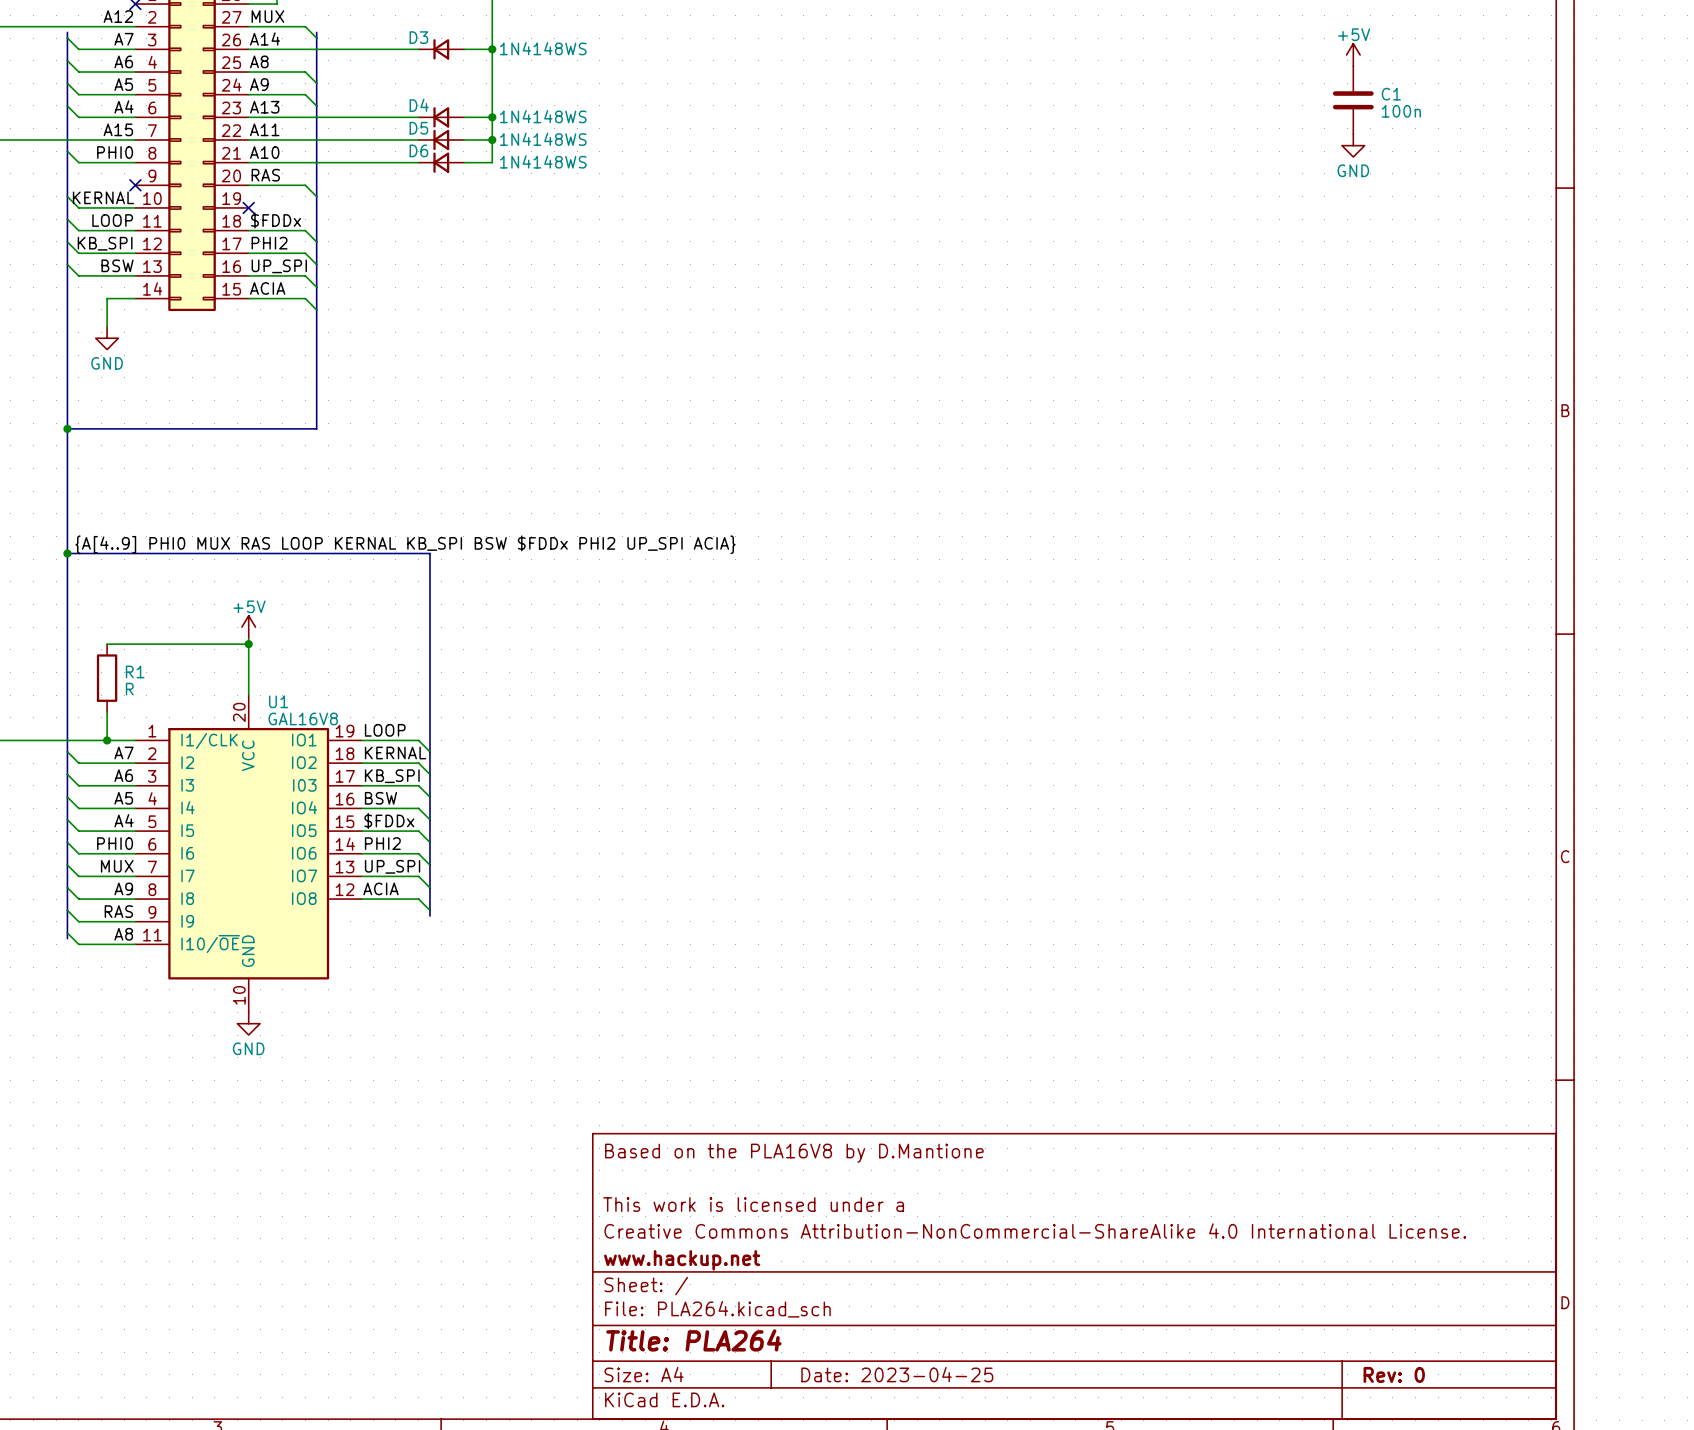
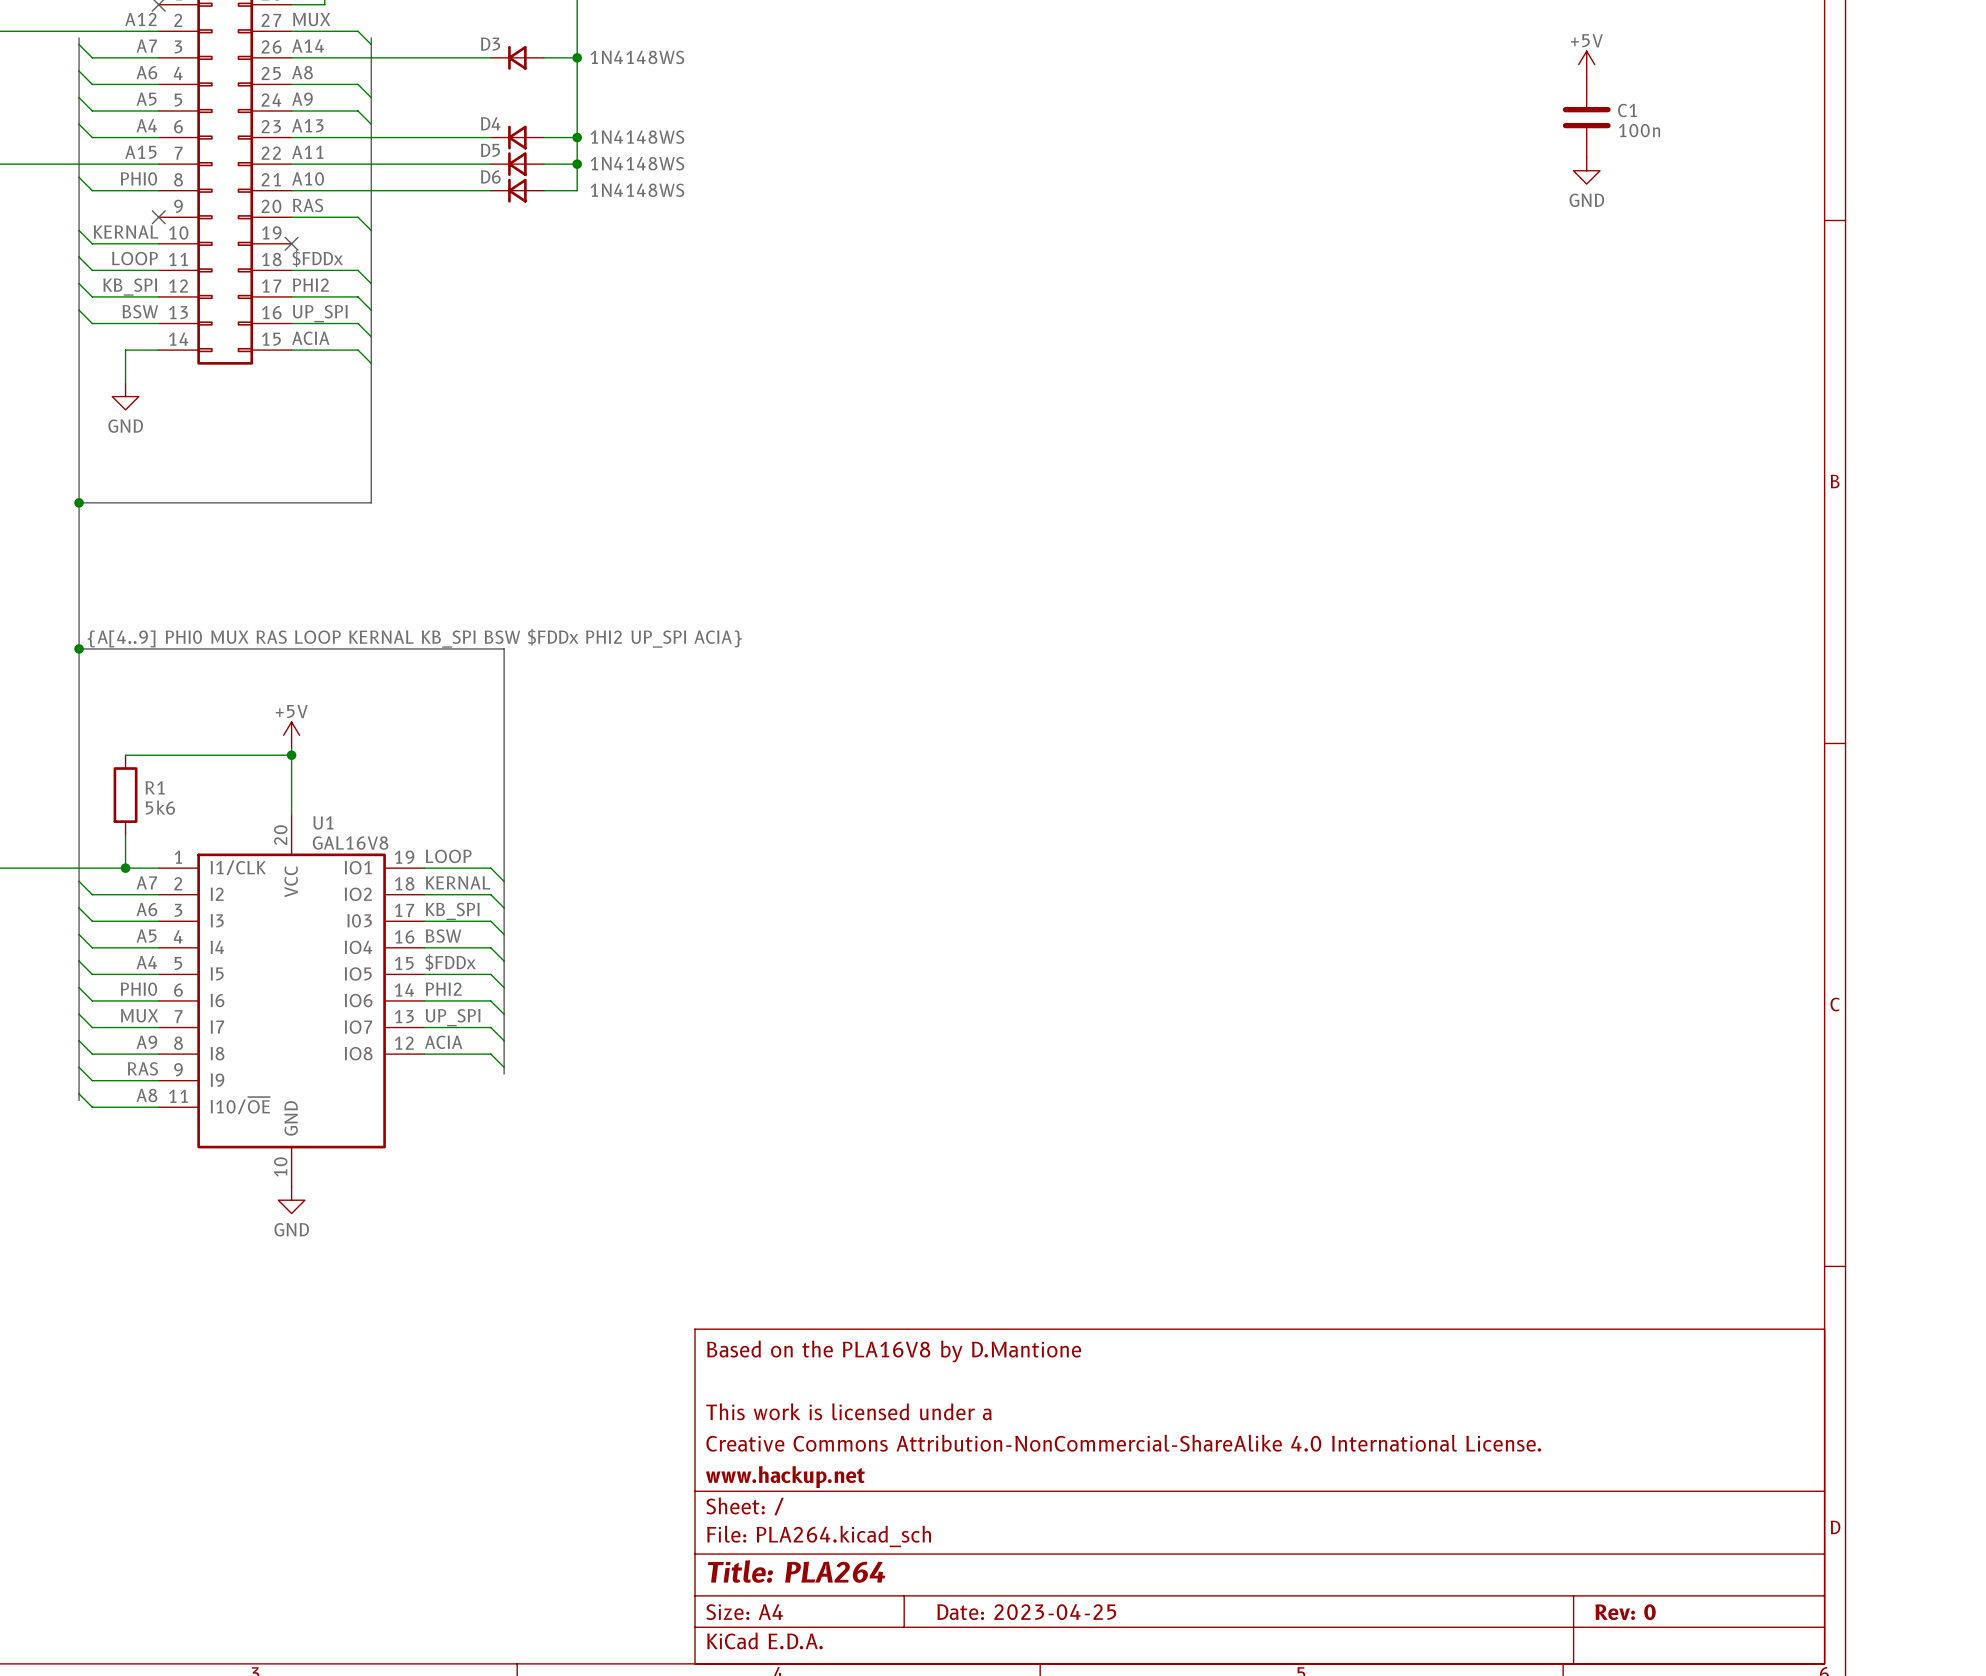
R1 value: R (129, 689) -> 5k6 (160, 807)

